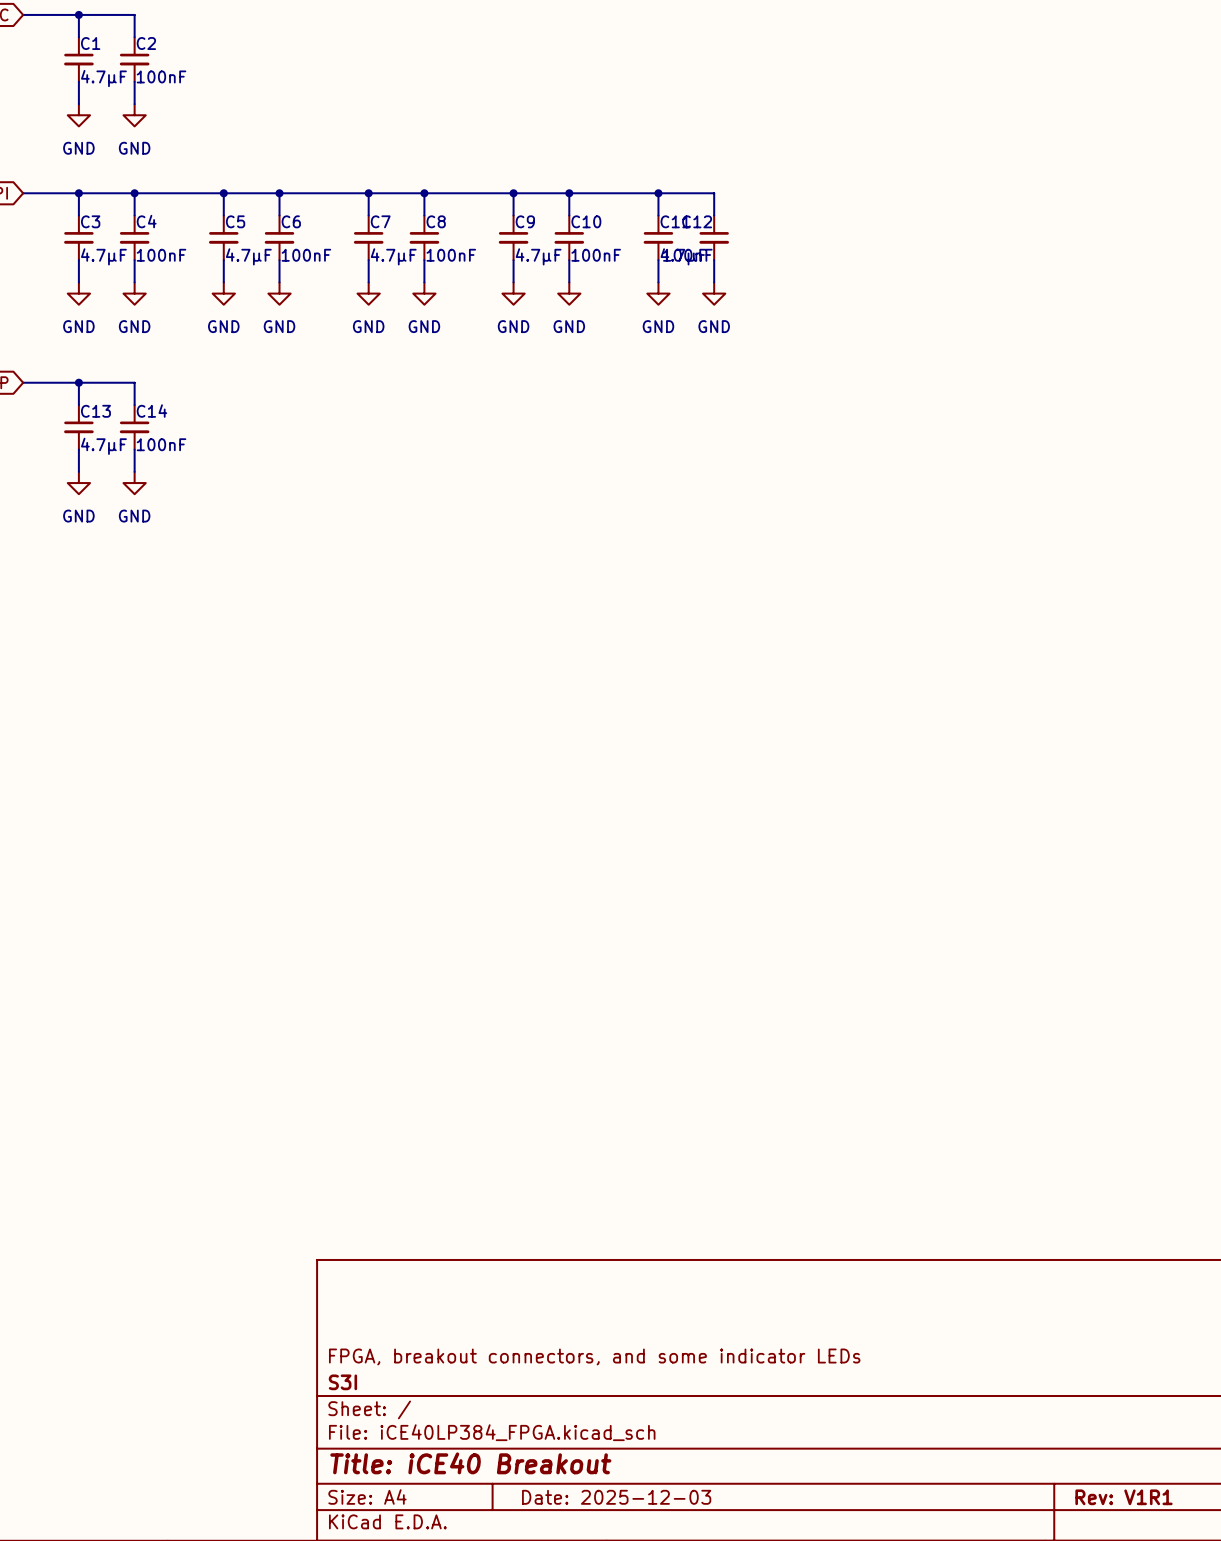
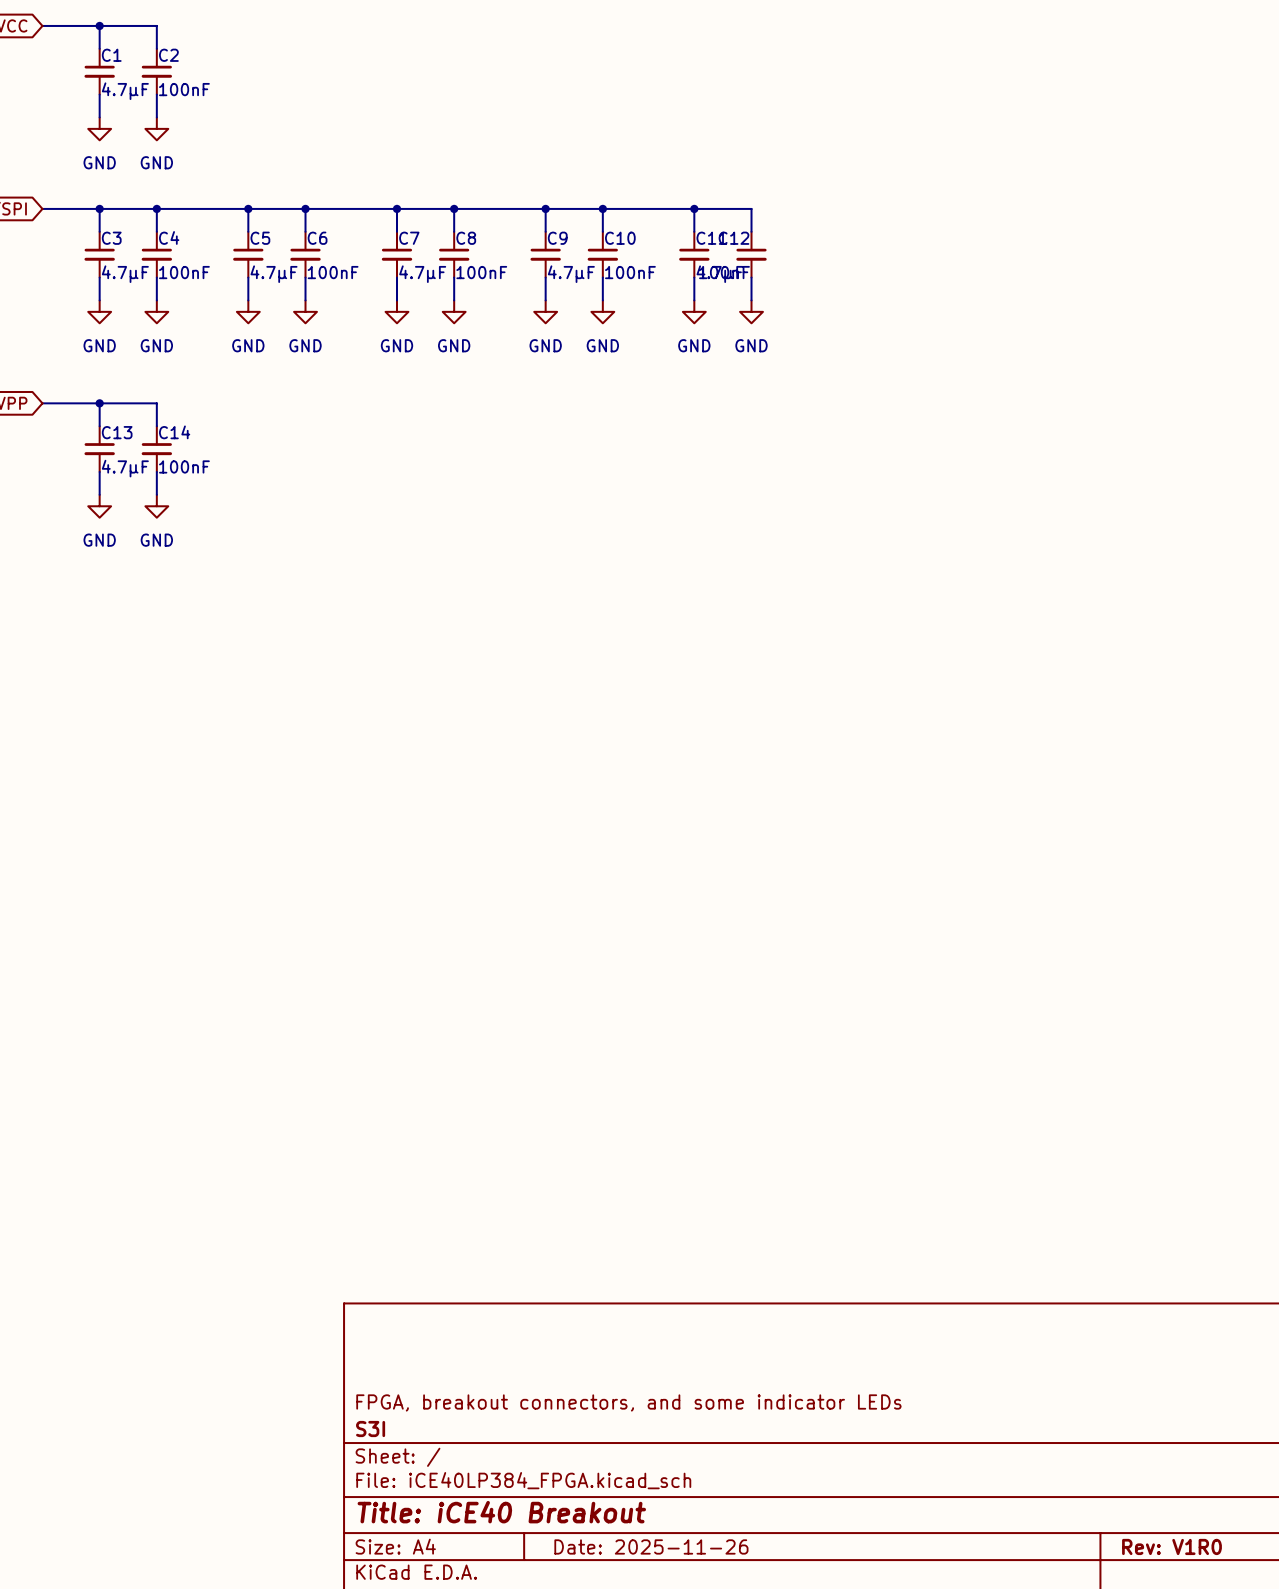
title block: Date: 2025-12-03 (616, 1497) -> Date: 2025-11-26 (651, 1546)
title block: Rev: V1R1 (1123, 1497) -> Rev: V1R0 (1172, 1546)

